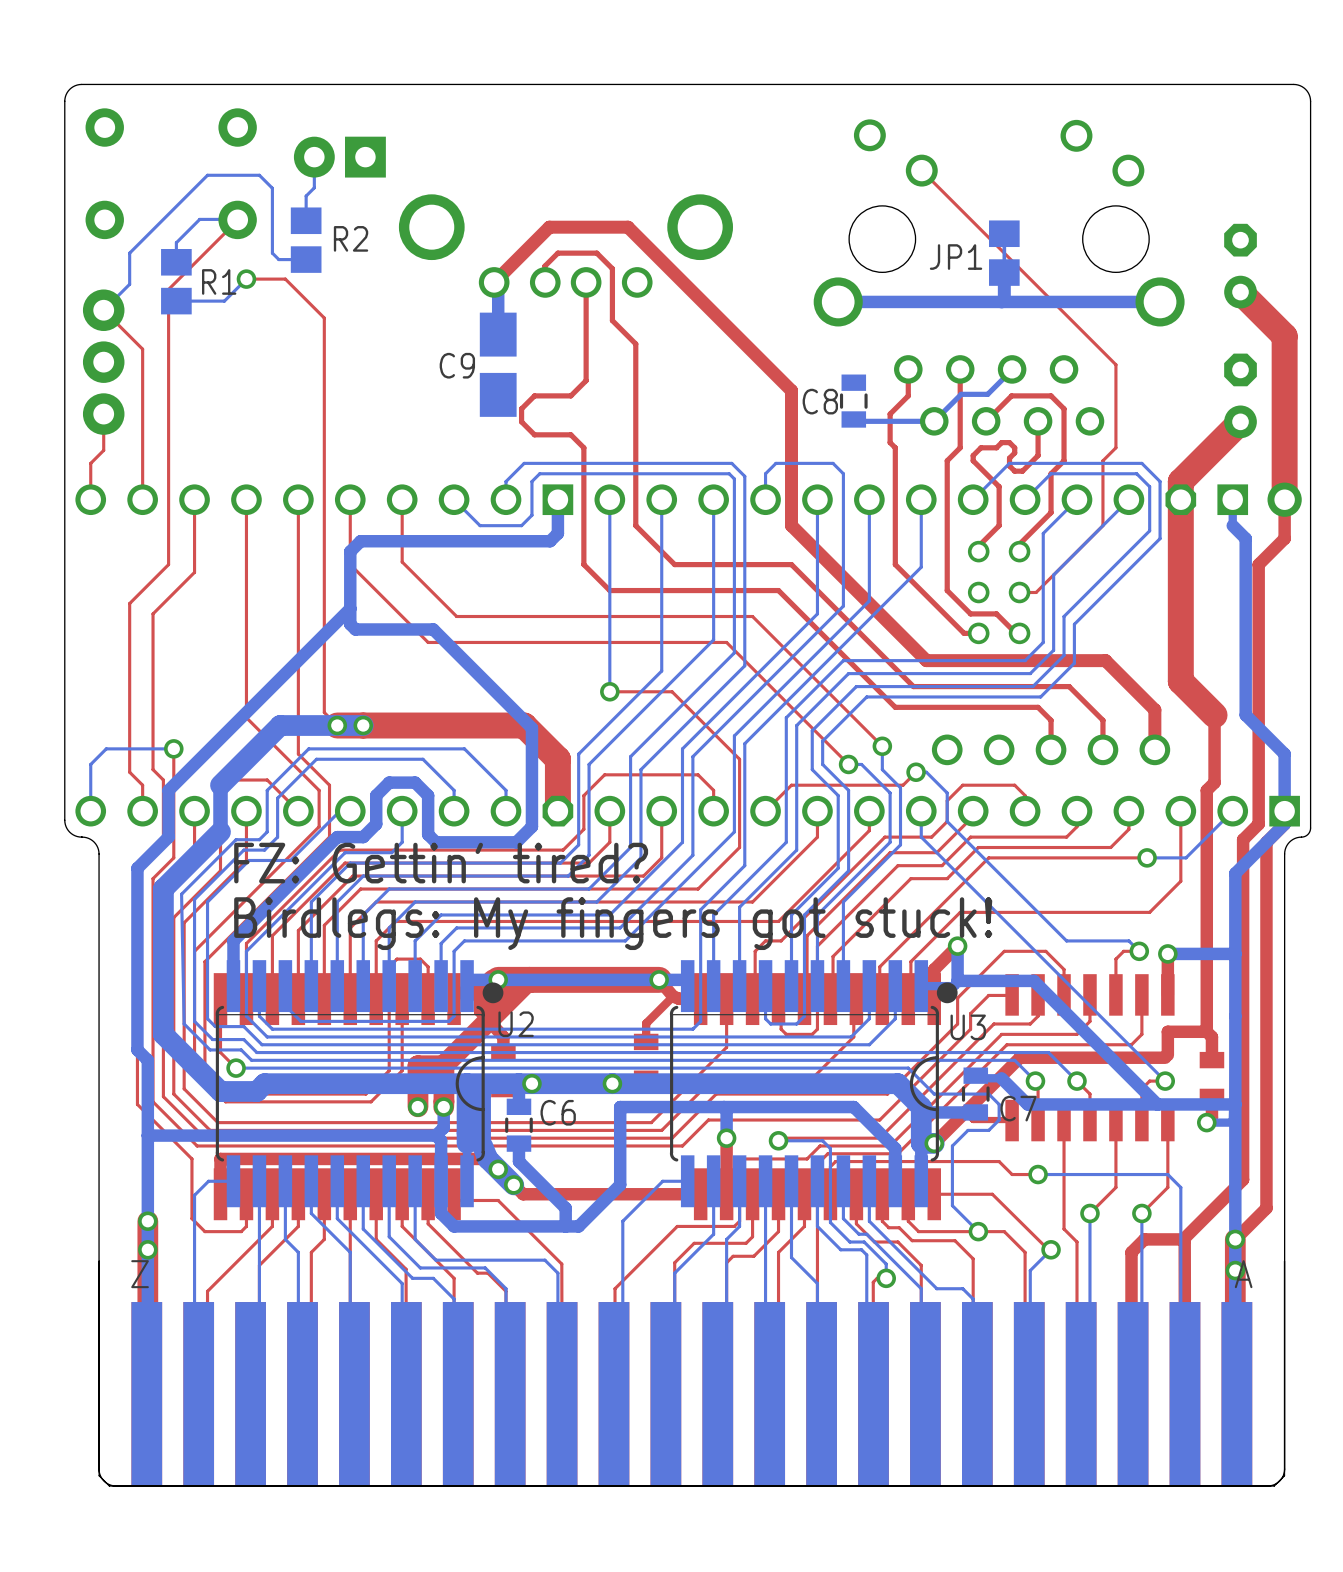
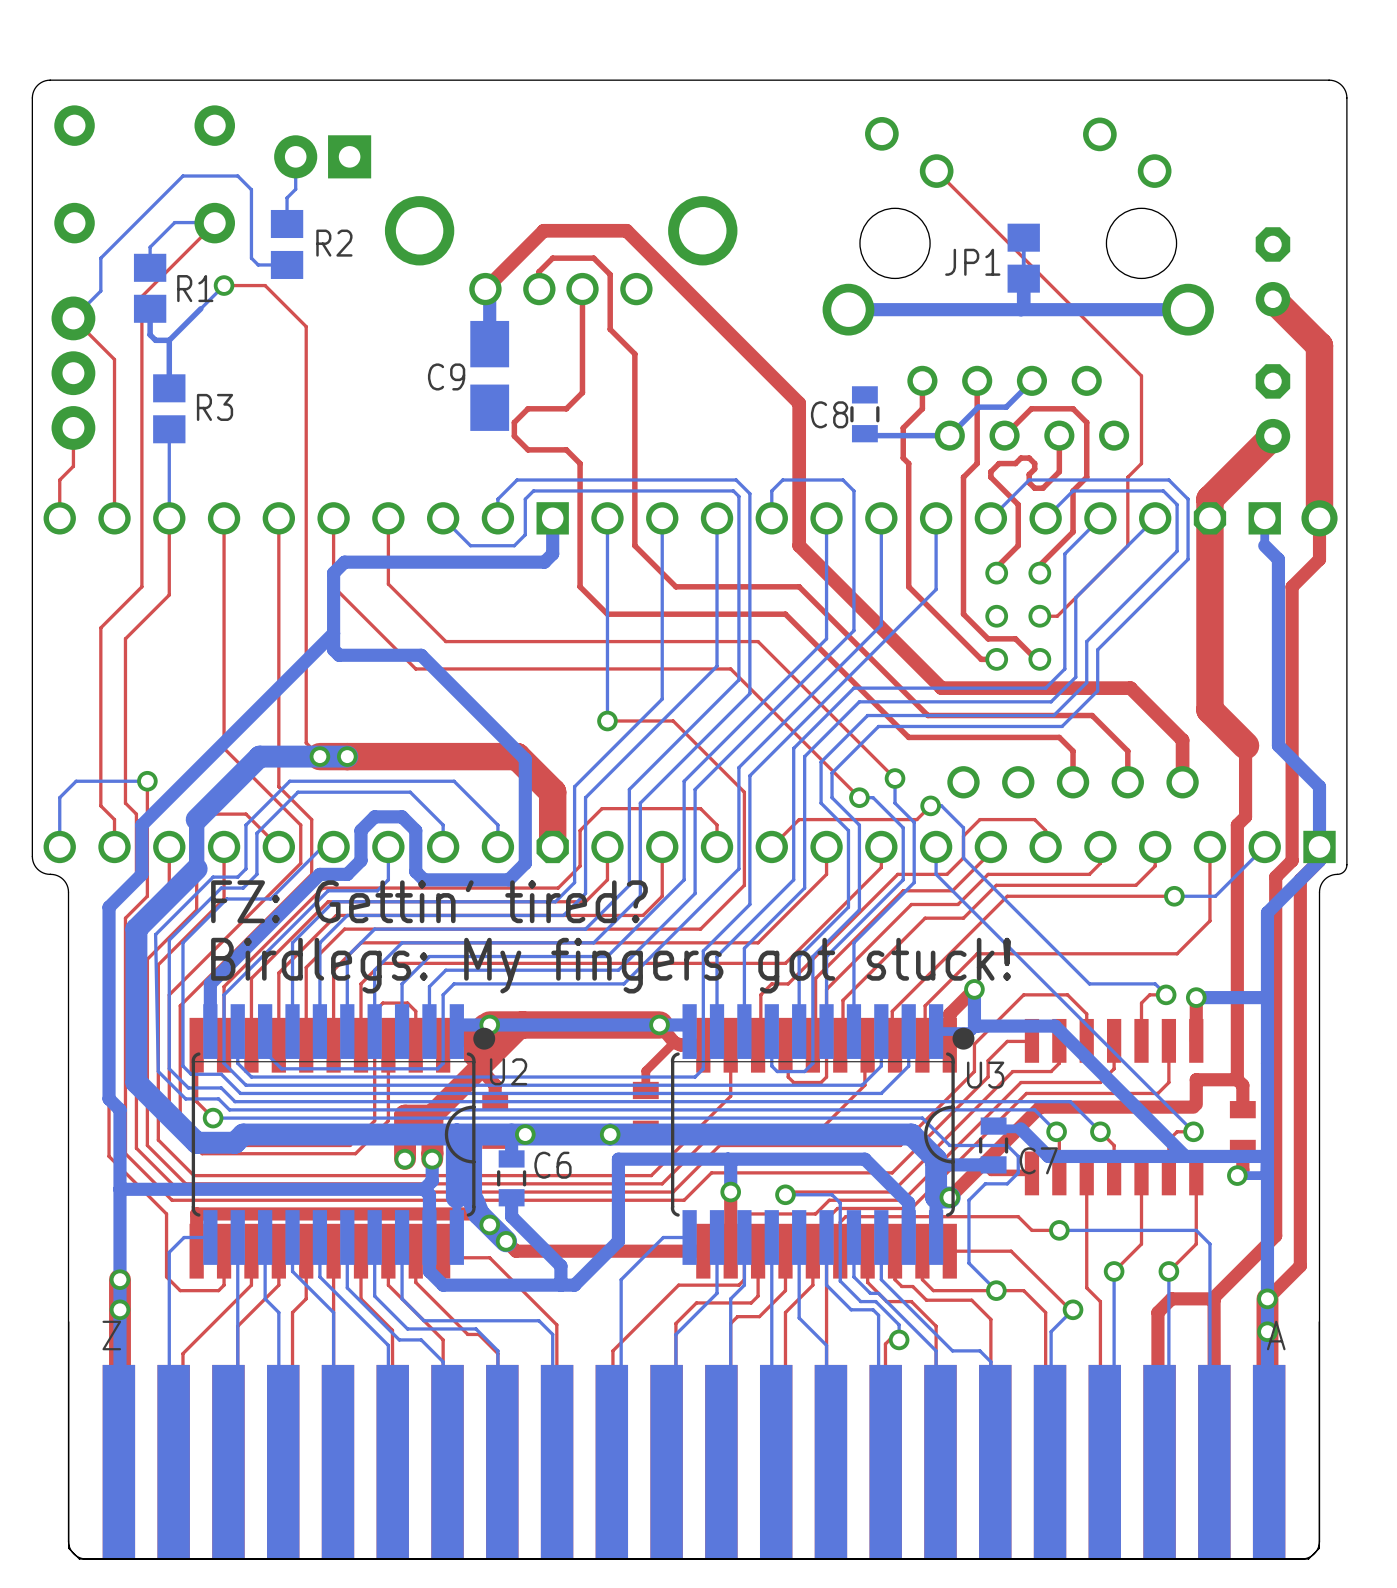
bottom track: none -> (150, 308) (150, 334) (155, 340) (169, 340)
bottom track: (224, 301) (176, 301) -> (200, 308) (169, 340)
bottom track: none -> (169, 340) (169, 388)
R3: none -> (169, 408)
bottom track: none -> (169, 429) (169, 518)

